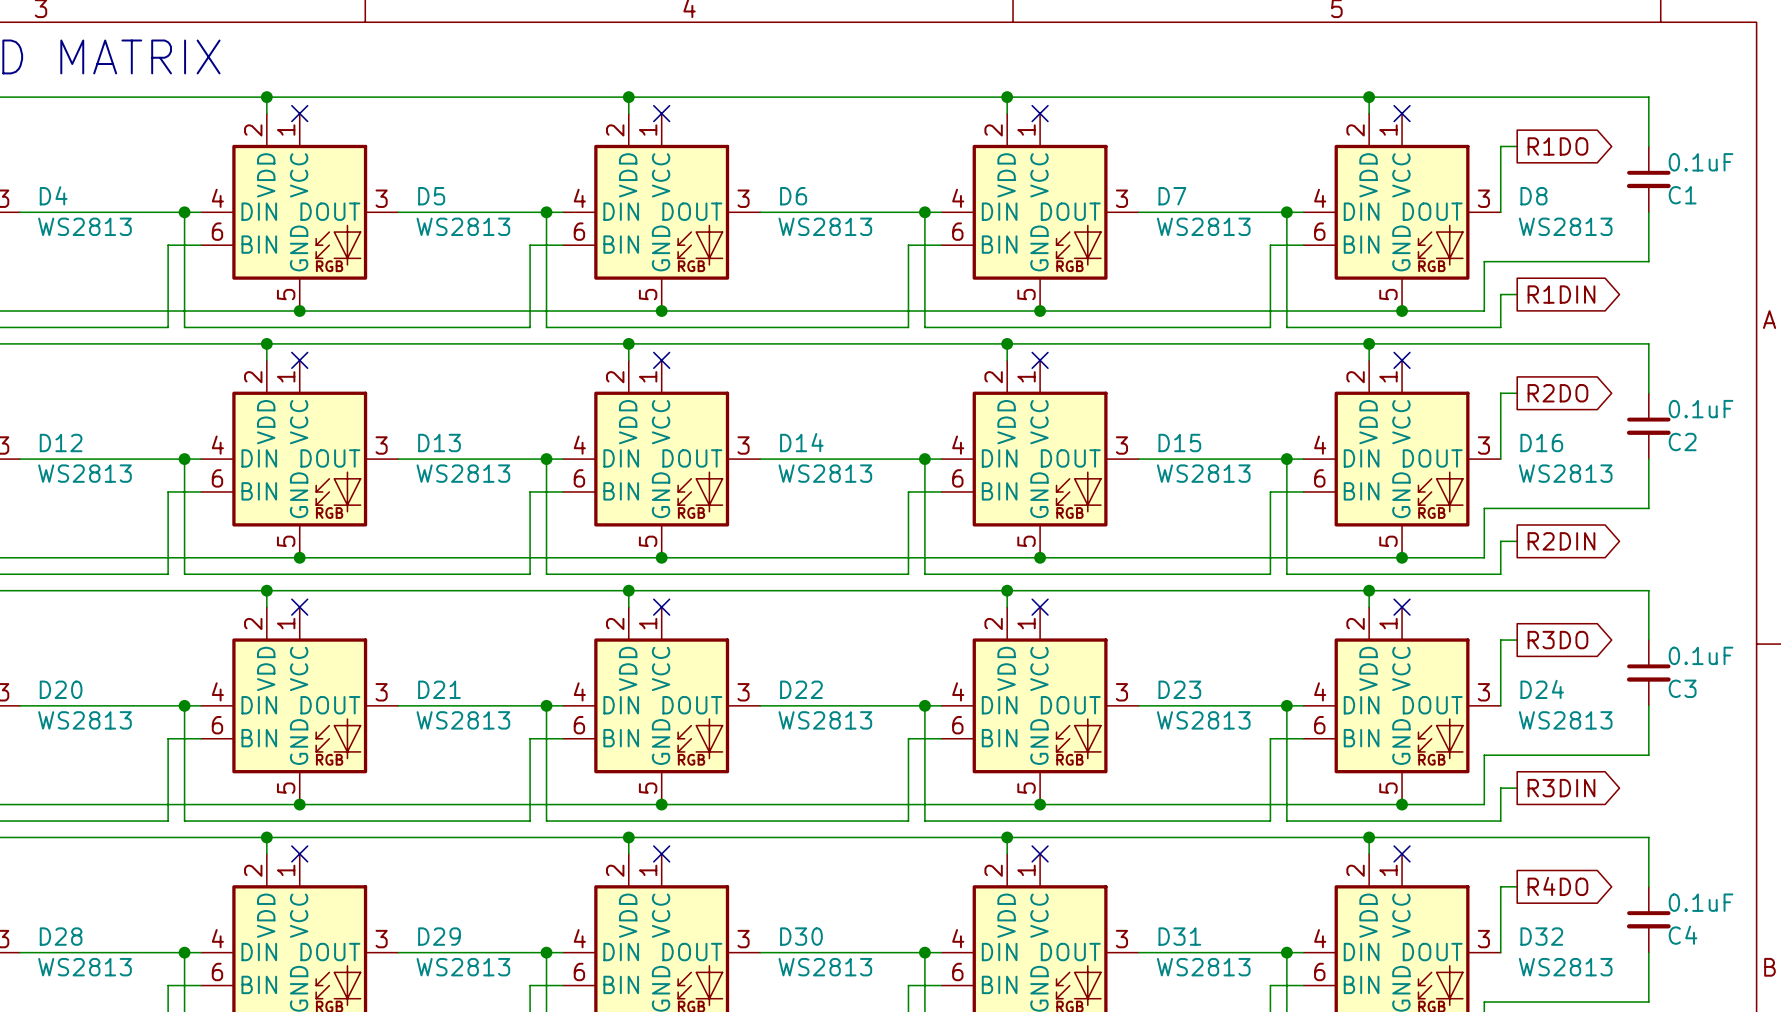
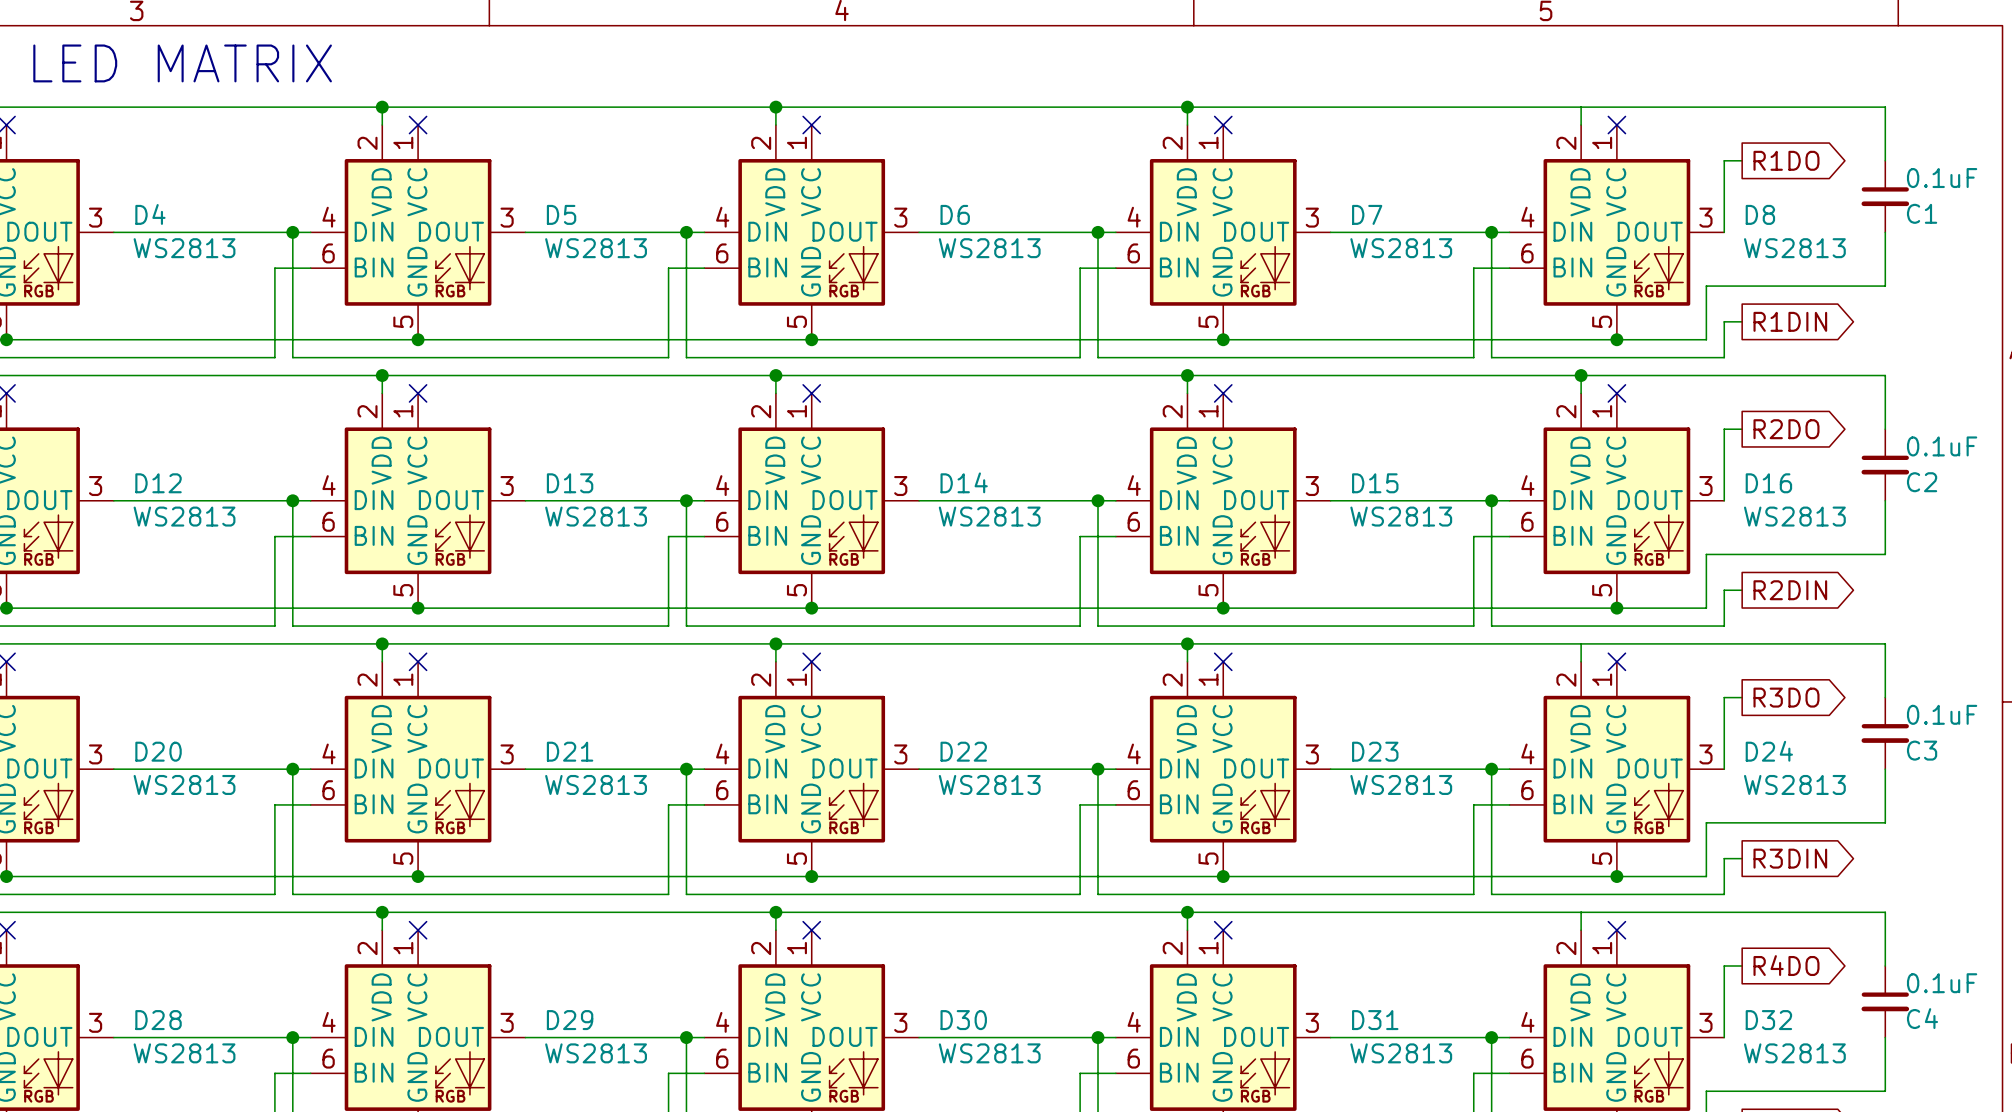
junction: (1369, 97) -> none
junction: (1369, 590) -> none
junction: (1369, 837) -> none

